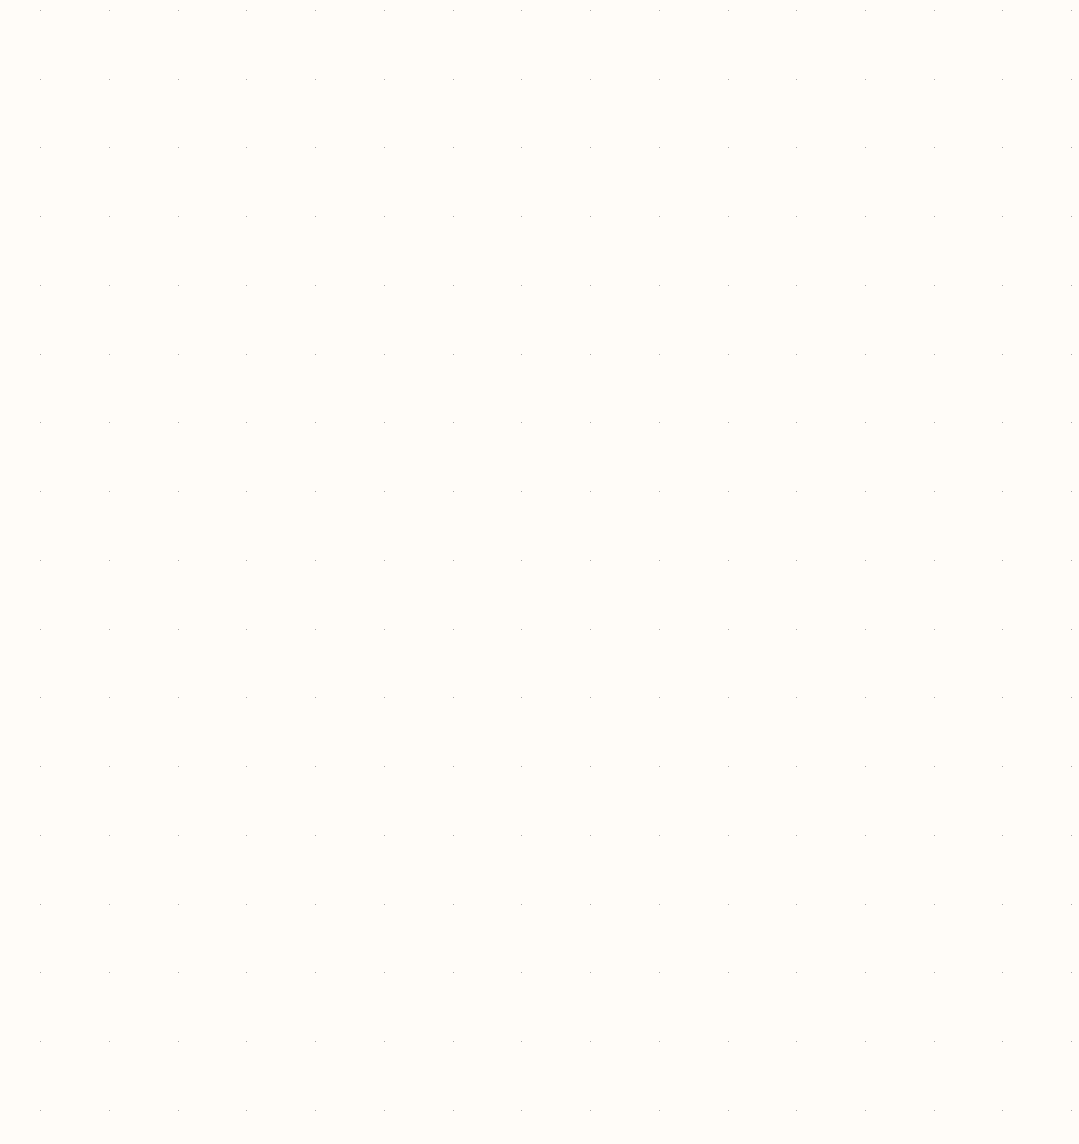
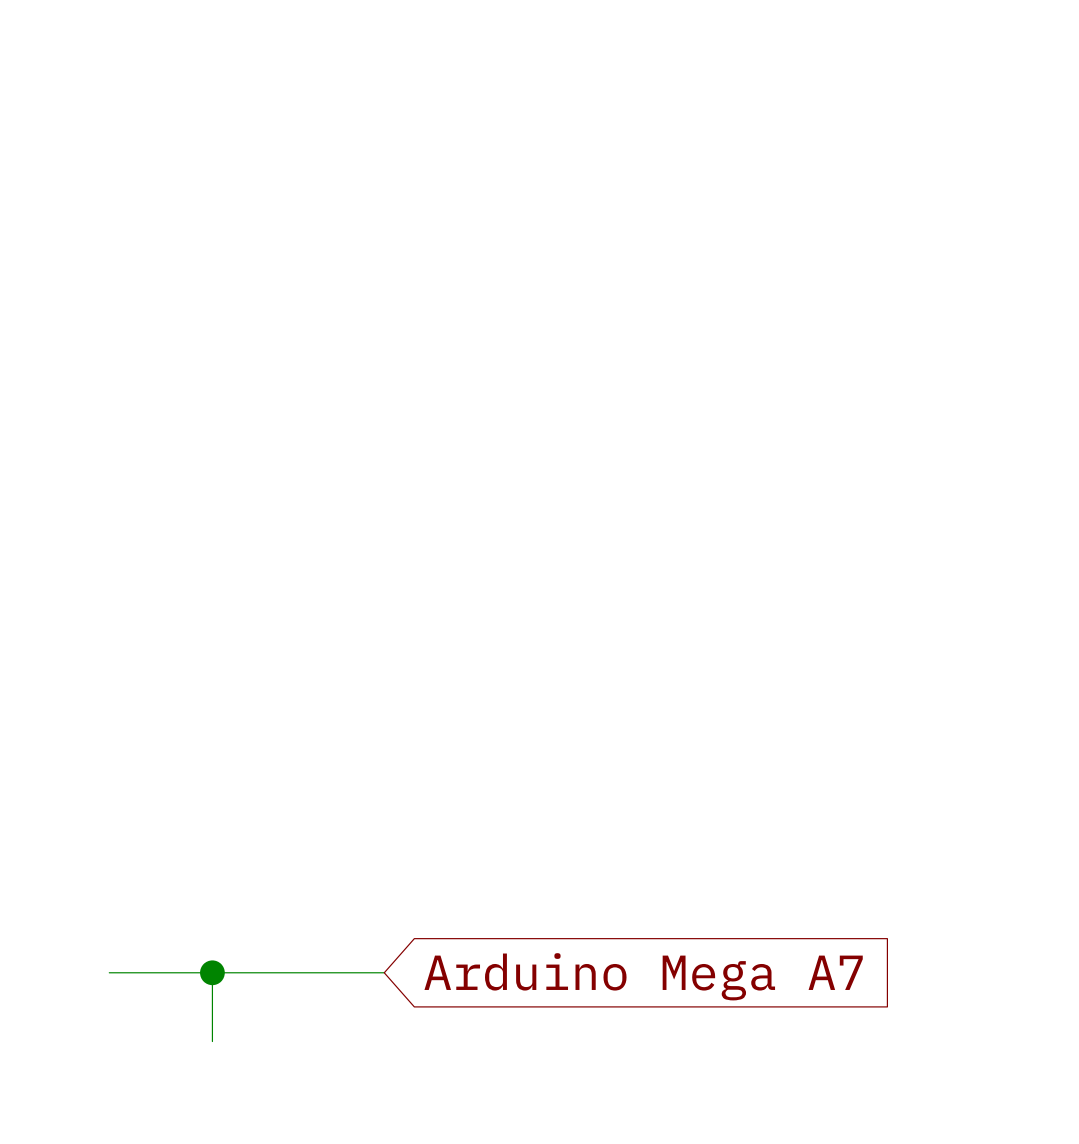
wire: none -> (109, 972) (384, 972)
wire: none -> (212, 972) (212, 1041)
junction: none -> (212, 972)
global label: none -> Arduino Mega A7 (643, 976)

